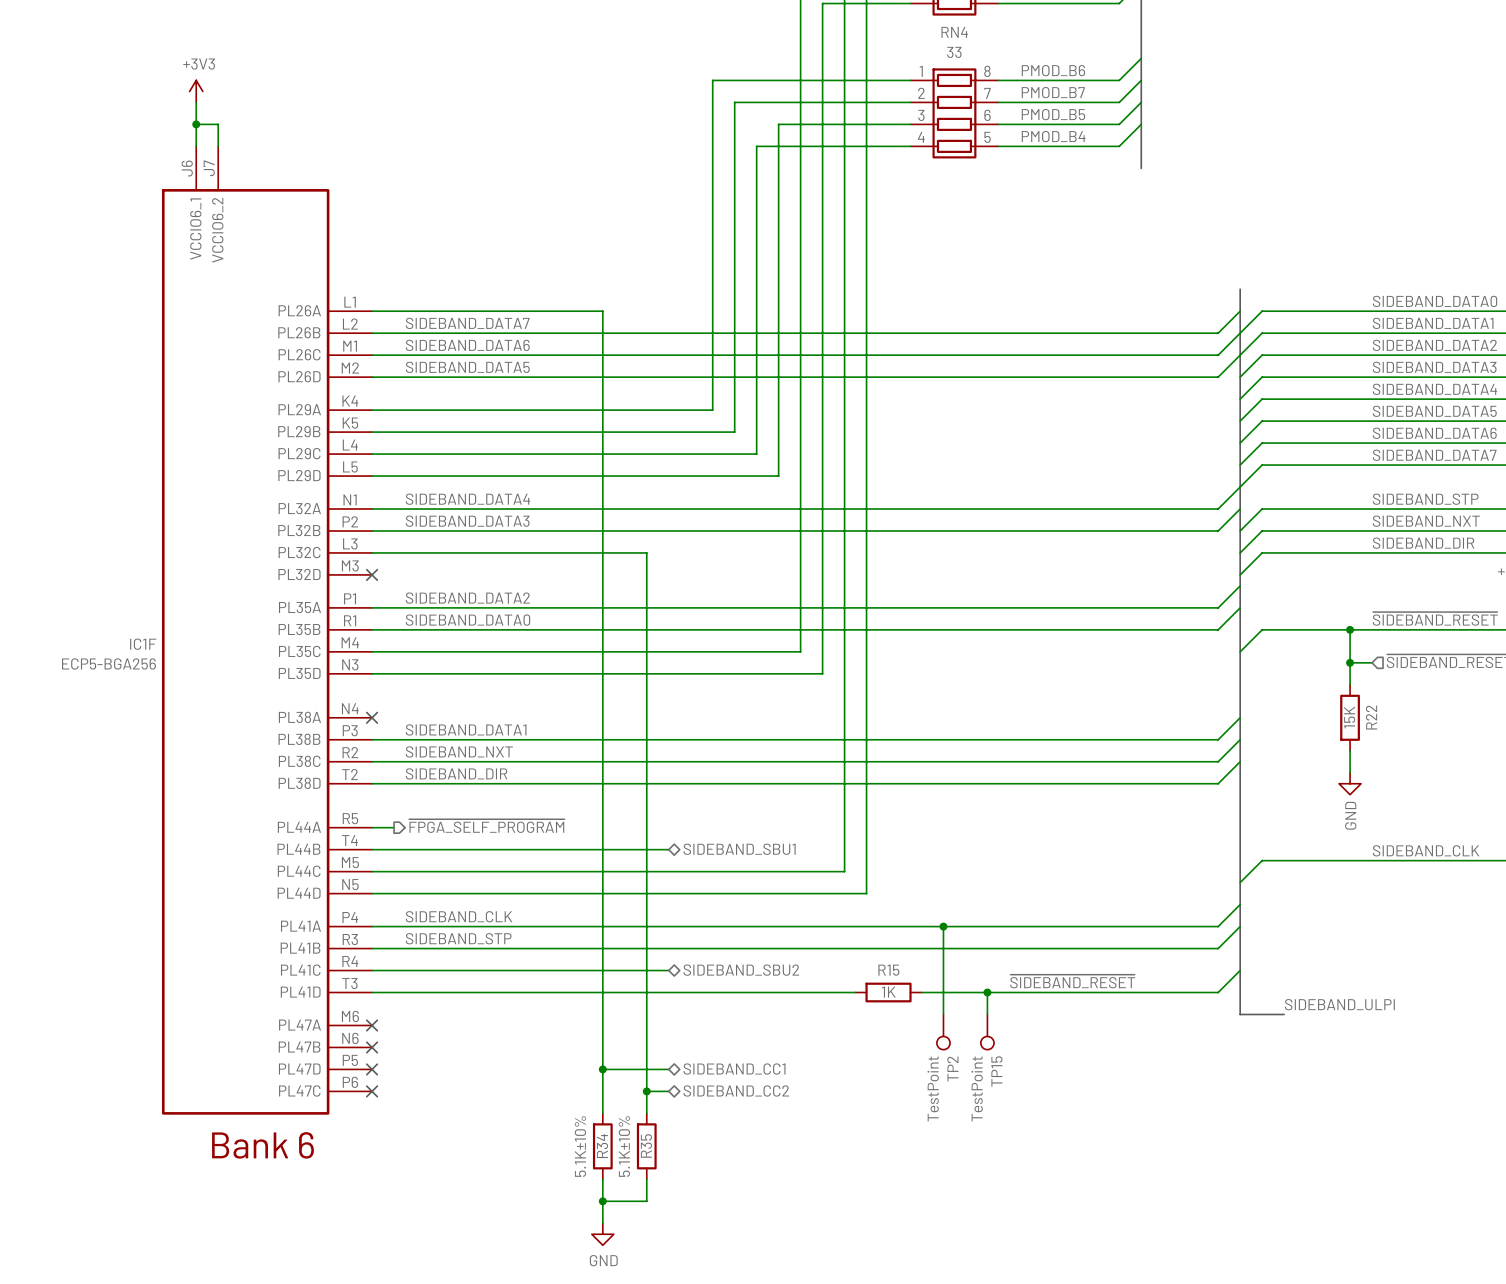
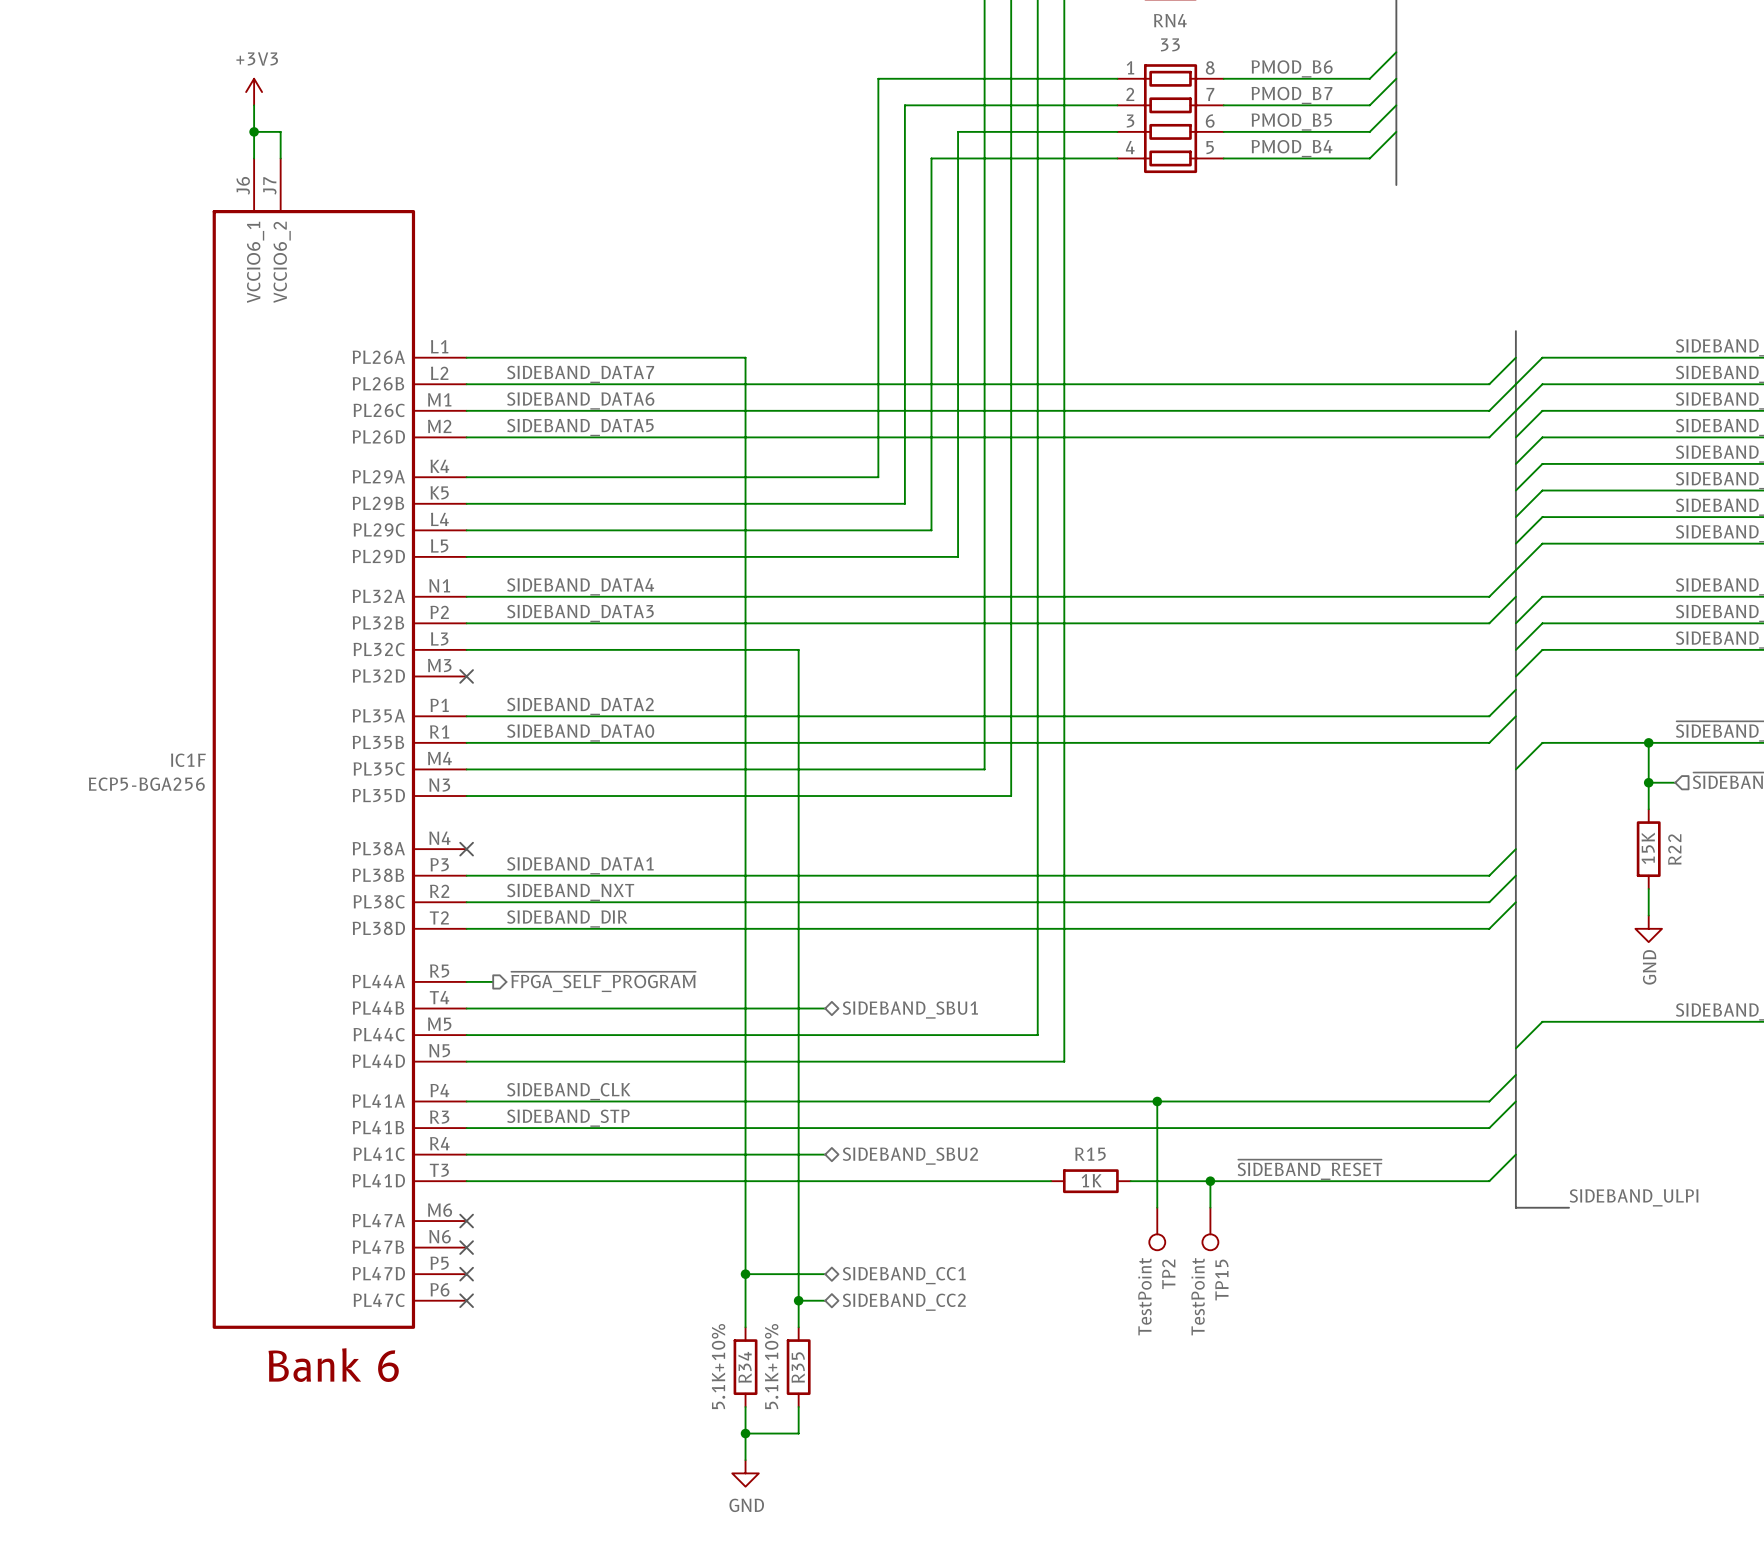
R34 value: 5.1K±10% (580, 1146) -> 5.1K+10% (718, 1366)
R35 value: 5.1K±10% (624, 1146) -> 5.1K+10% (771, 1366)

